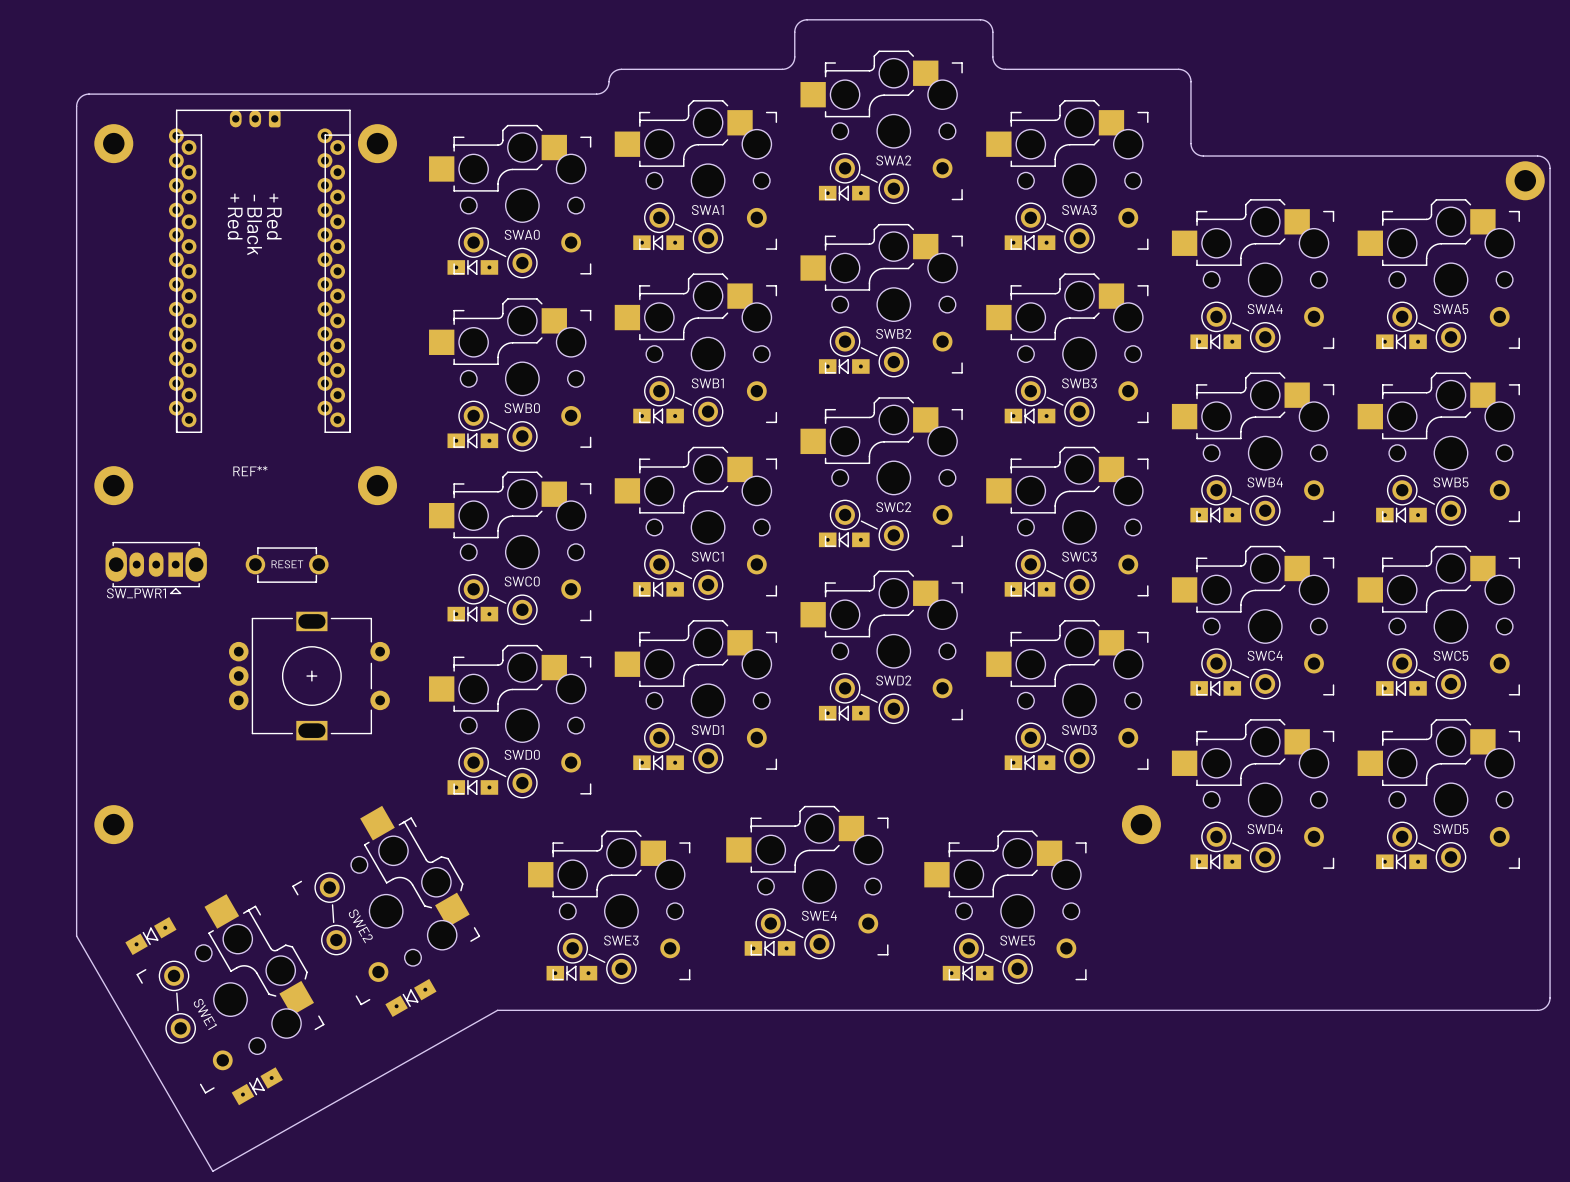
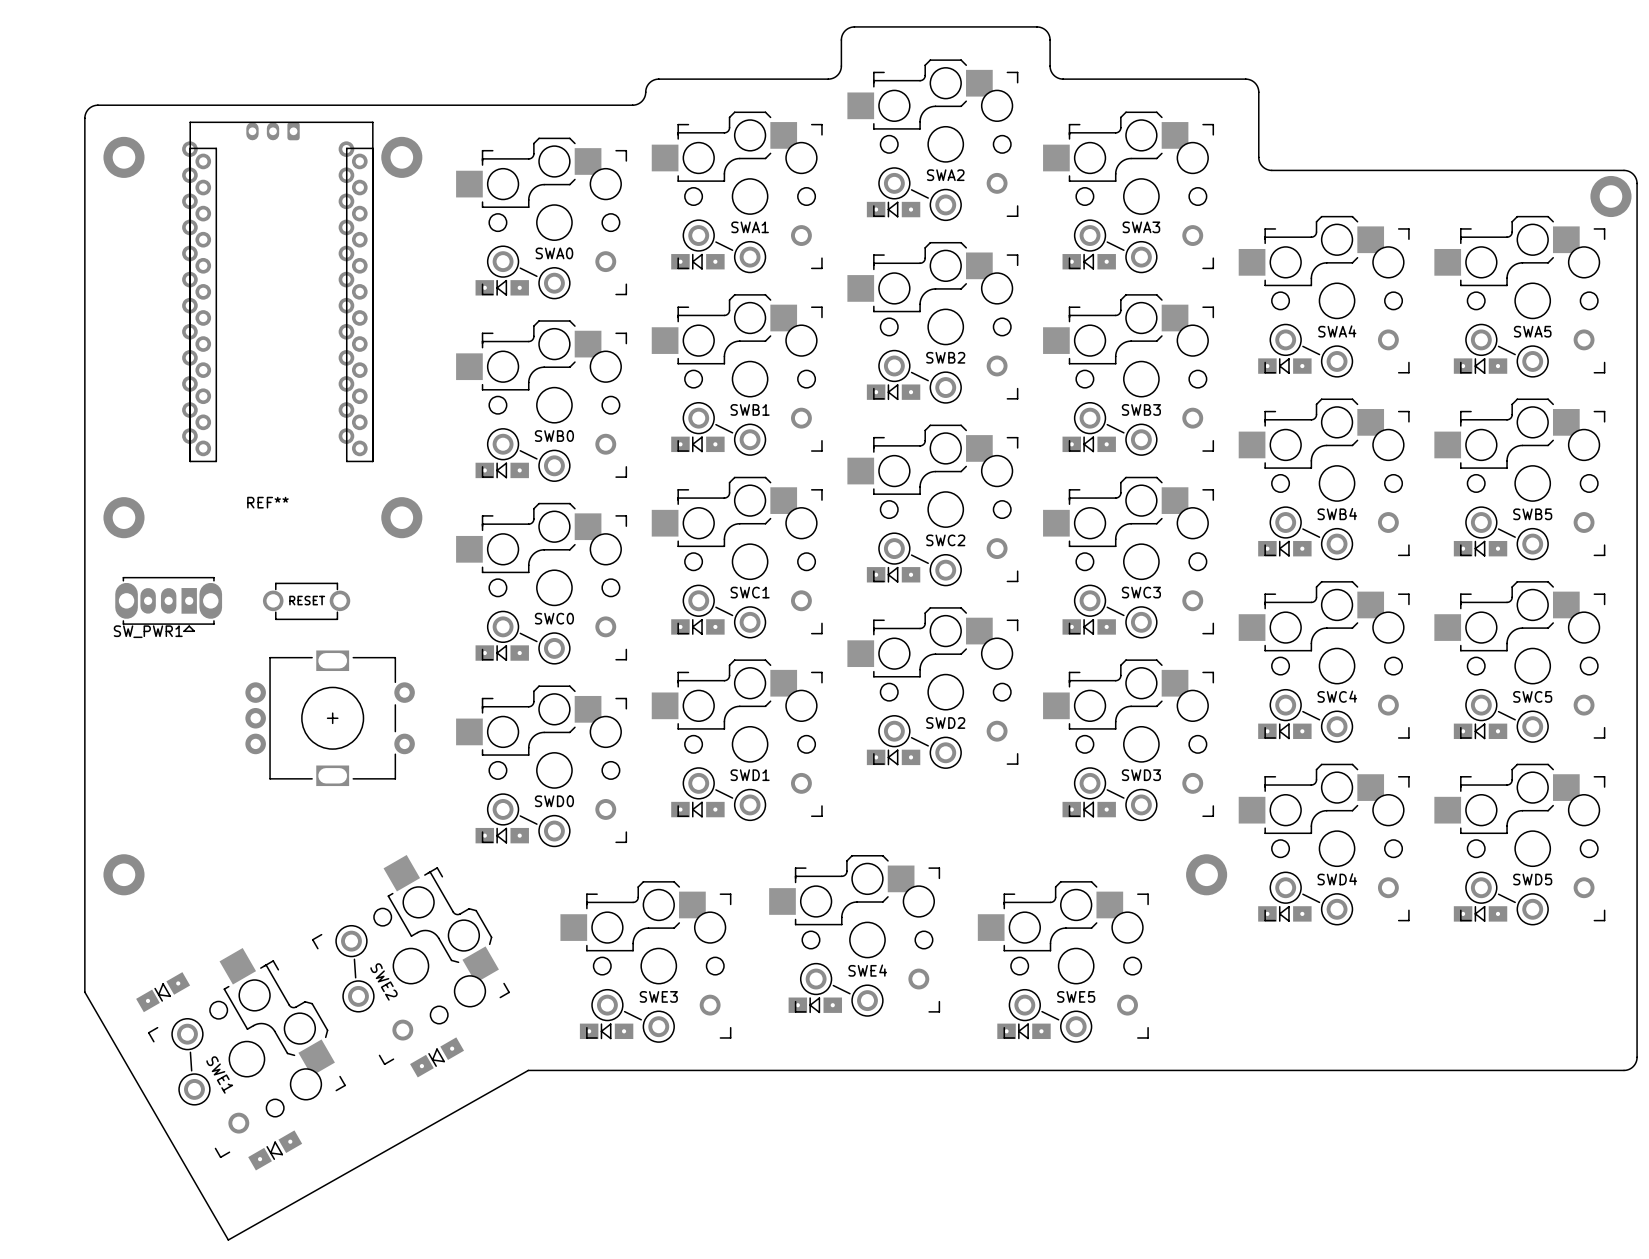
text: + (234, 198) -> none
text: - (254, 198) -> none
text: + (273, 198) -> none
text: Red (235, 223) -> none
text: Red (274, 223) -> none
text: Black (254, 231) -> none

